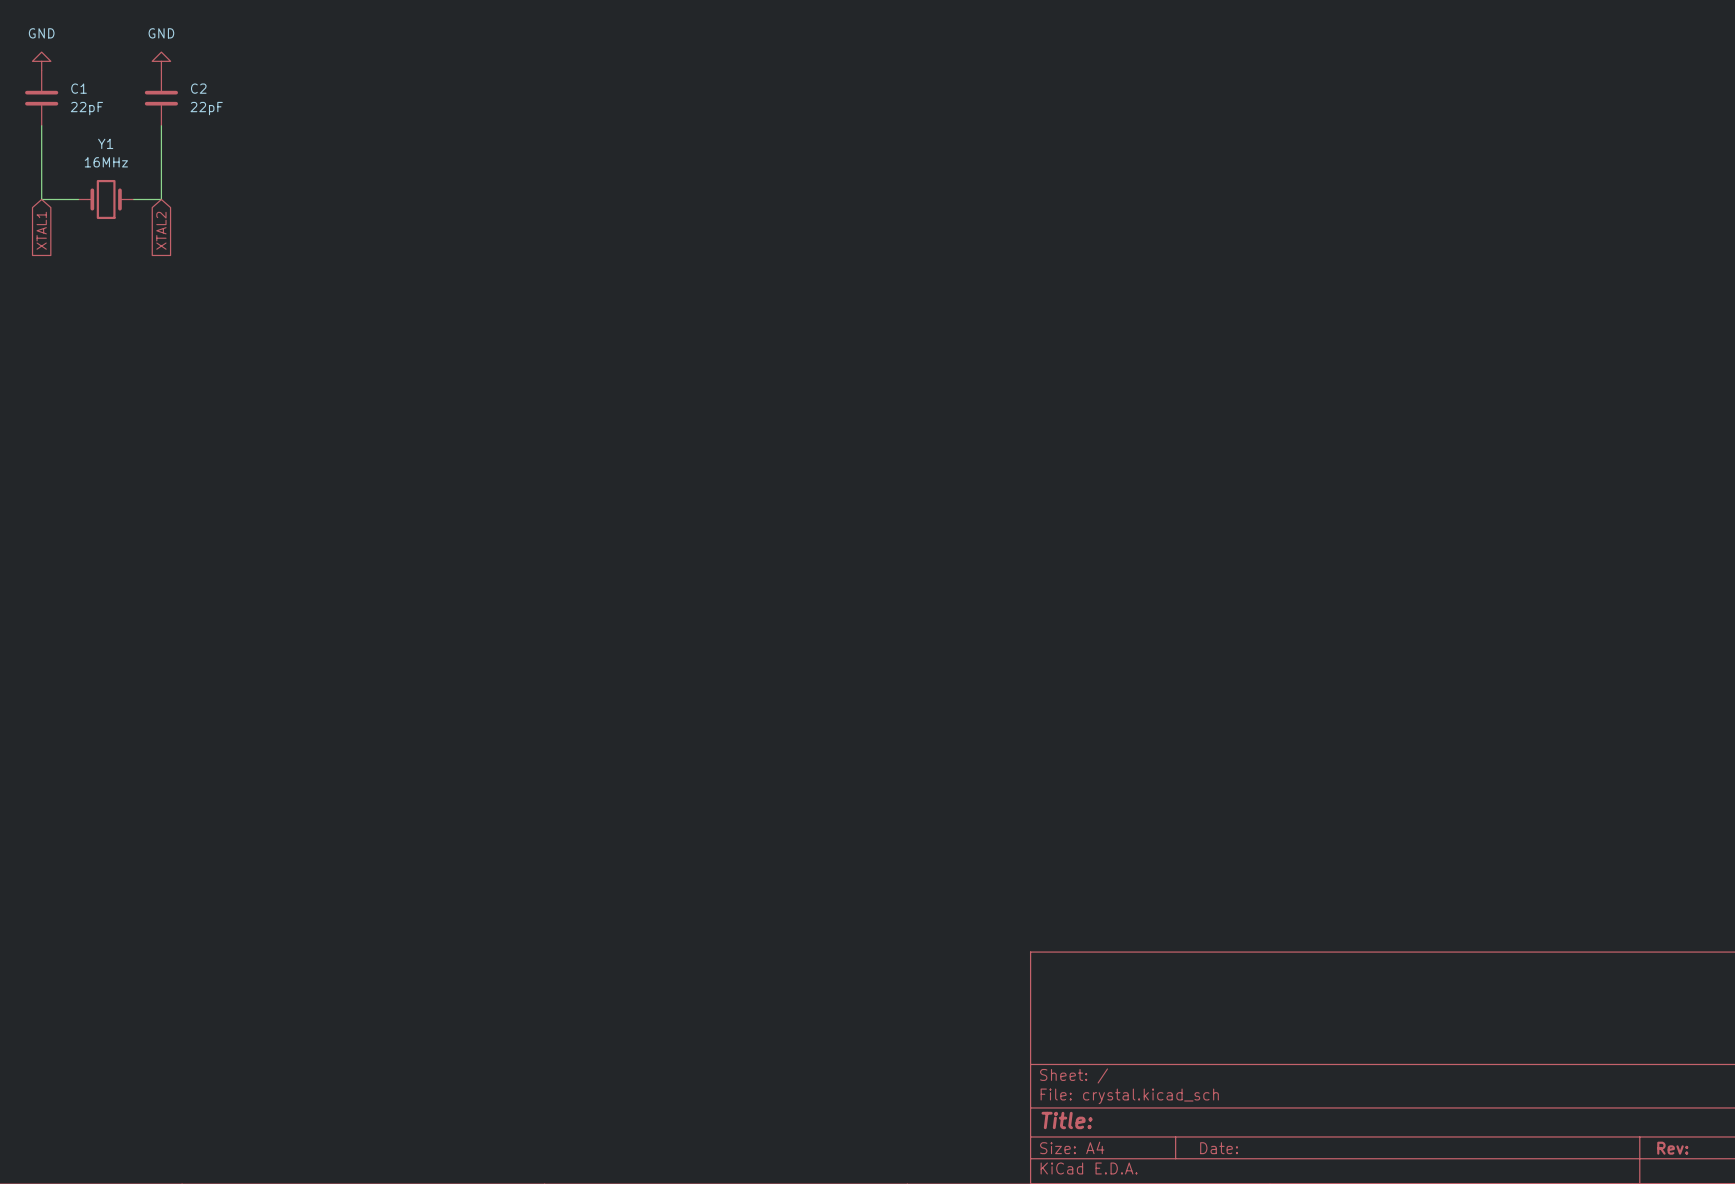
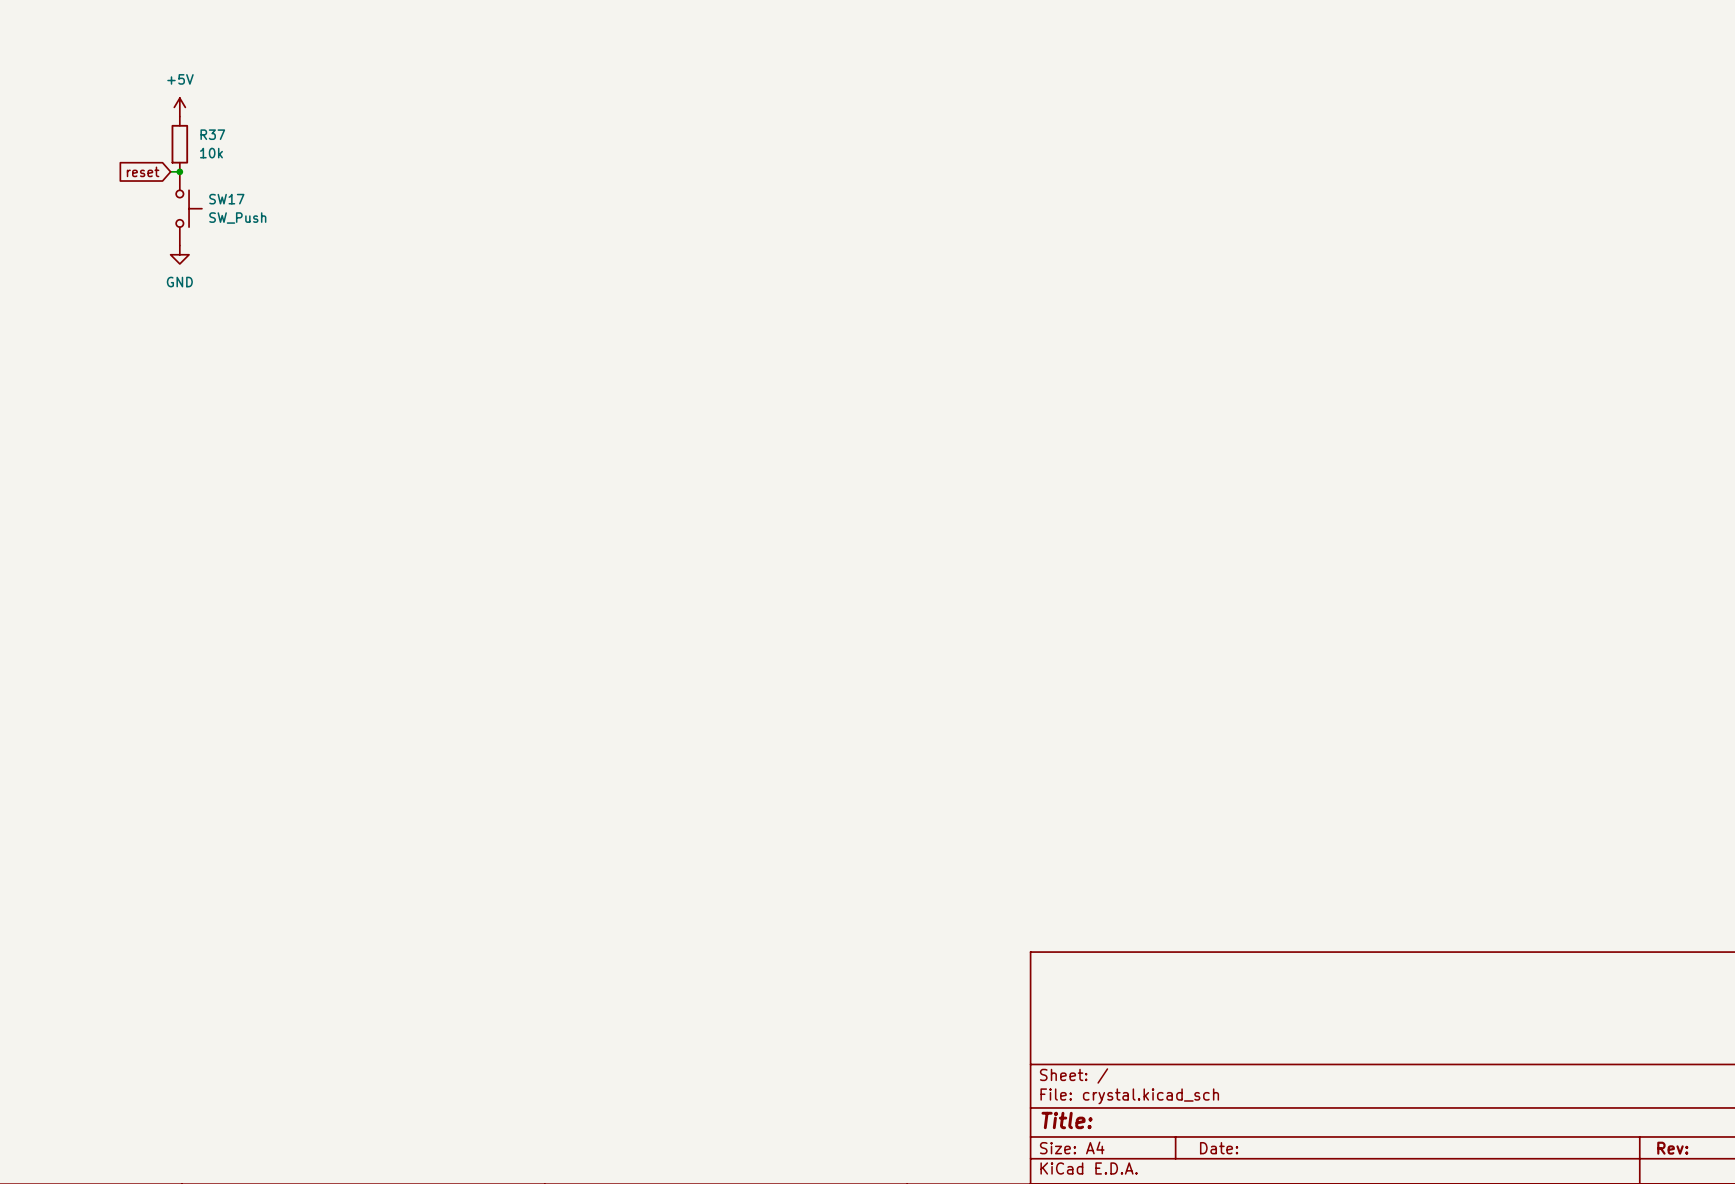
power symbol: GND (41, 61) -> none
power symbol: GND (161, 61) -> none
C1: 22pF (41, 98) -> none
C2: 22pF (161, 98) -> none
power symbol: none -> +5V (179, 107)
wire: (41, 125) (41, 199) (78, 199) -> none
wire: (161, 125) (161, 199) (133, 199) -> none
R37: none -> 10k (179, 144)
global label: none -> reset (143, 171)
wire: none -> (170, 171) (179, 171)
junction: none -> (179, 171)
Y1: 16MHz (106, 199) -> none
SW17: none -> SW_Push (189, 208)
global label: XTAL1 (41, 230) -> none
global label: XTAL2 (161, 230) -> none
power symbol: none -> GND (179, 254)

